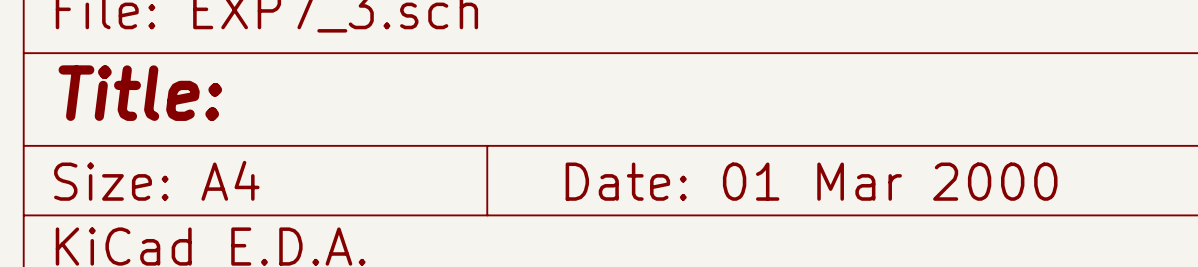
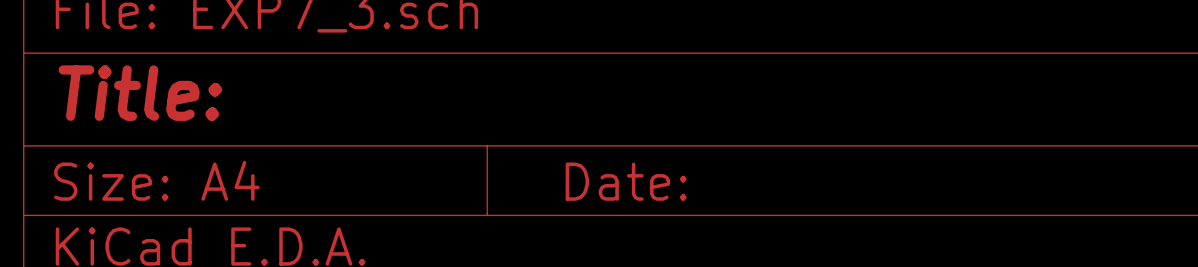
title block: Date: 01 Mar 2000 (811, 181) -> Date: (626, 181)

